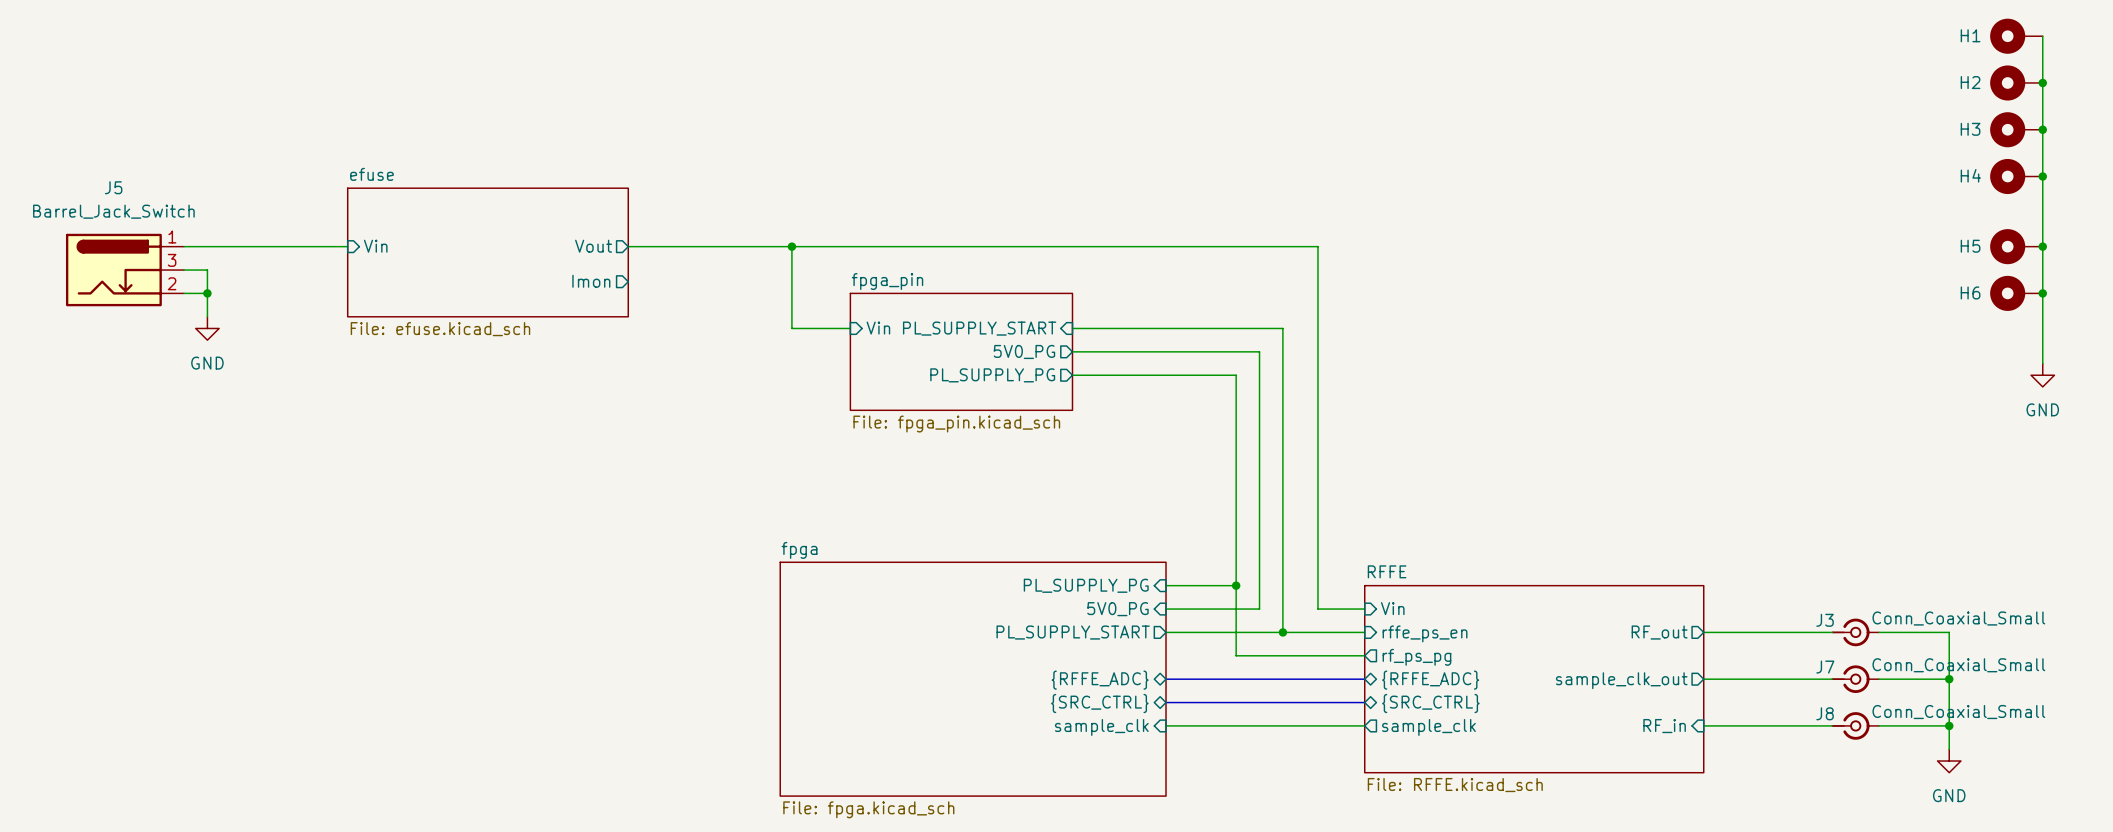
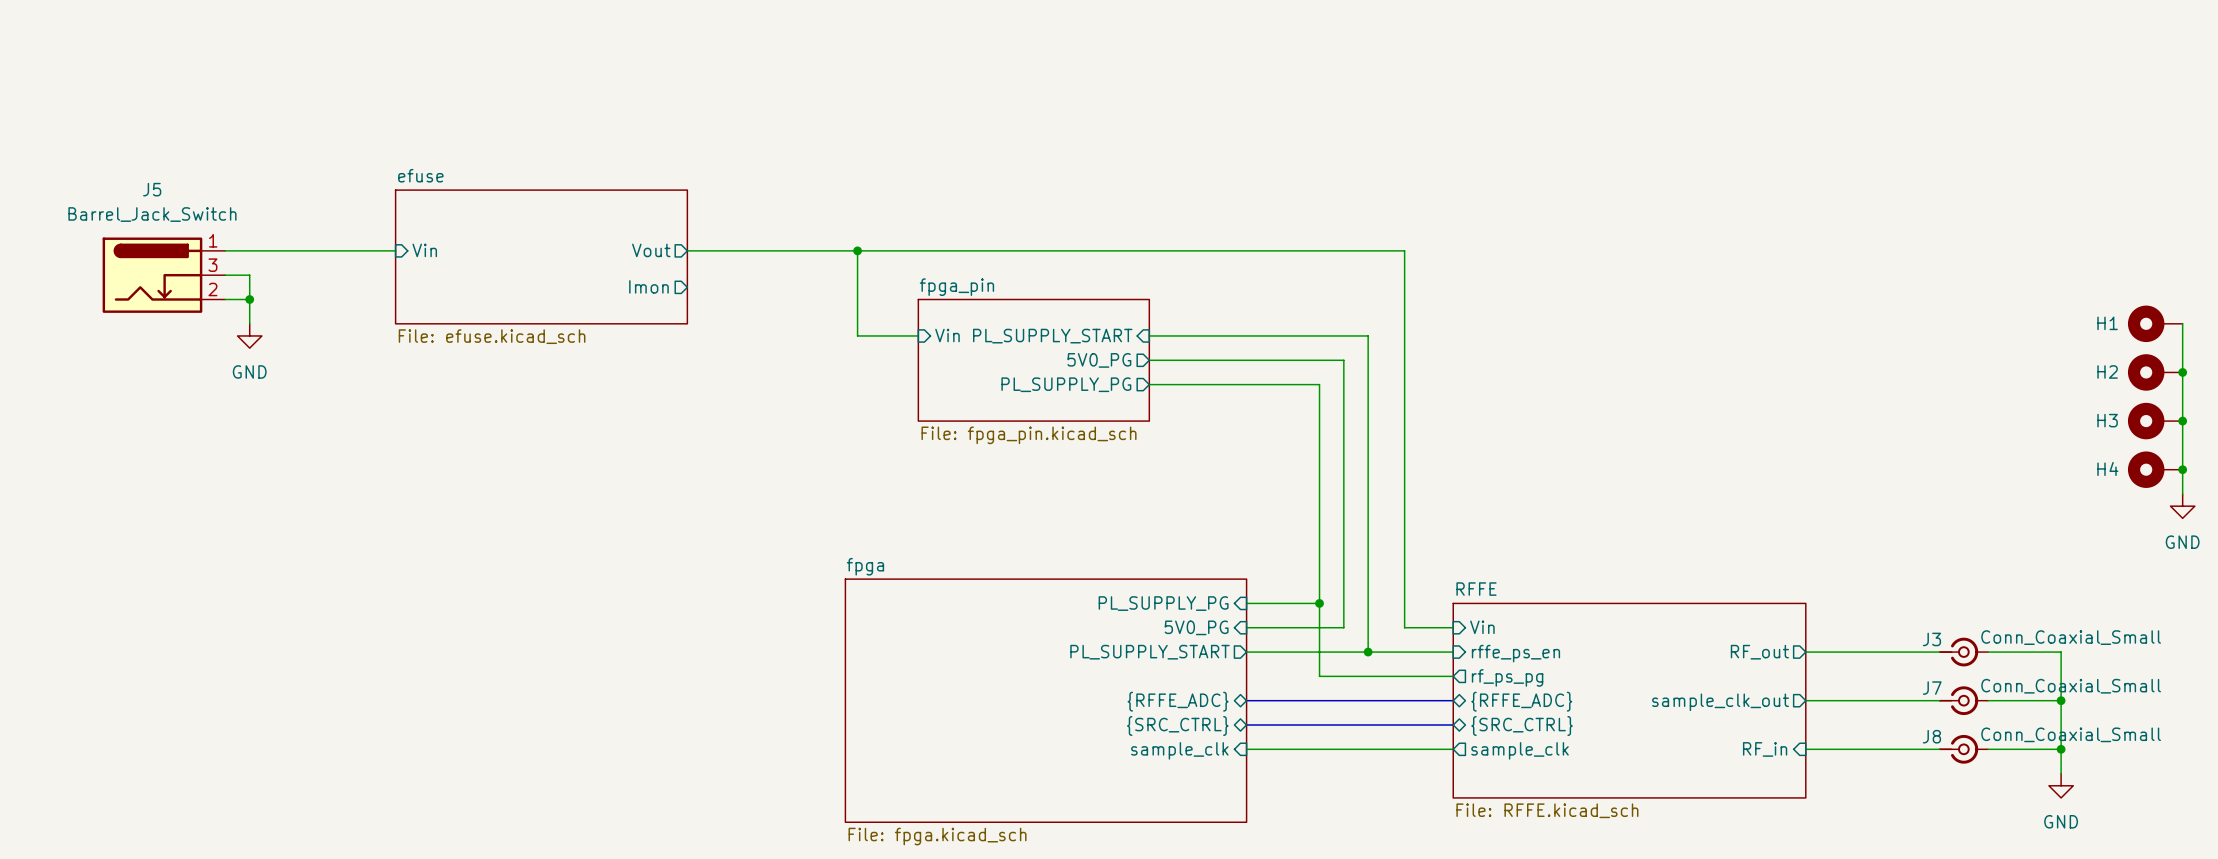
H1 position: (2016, 36) -> (2155, 323)
wire: (2042, 36) (2042, 363) -> none
H2 position: (2016, 82) -> (2155, 372)
junction: (2042, 82) -> none
H3 position: (2016, 129) -> (2155, 421)
junction: (2042, 129) -> none
H4 position: (2016, 176) -> (2155, 469)
junction: (2042, 176) -> none
H5: (2016, 246) -> none
junction: (2042, 246) -> none
H6: (2016, 293) -> none
junction: (2042, 293) -> none
wire: none -> (2182, 323) (2182, 494)
junction: none -> (2182, 372)
power symbol position: GND (2042, 375) -> GND (2182, 506)
junction: none -> (2182, 421)
junction: none -> (2182, 469)

